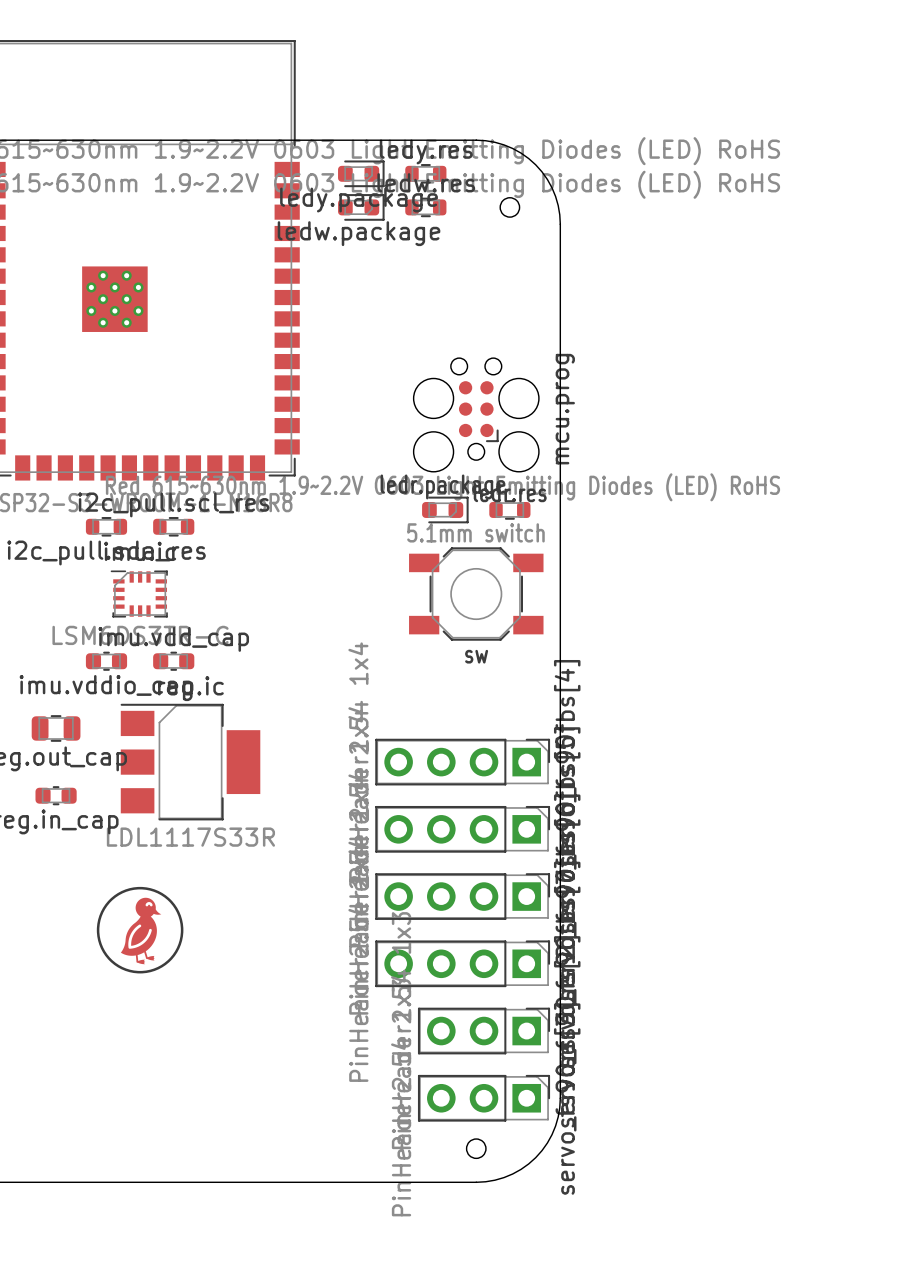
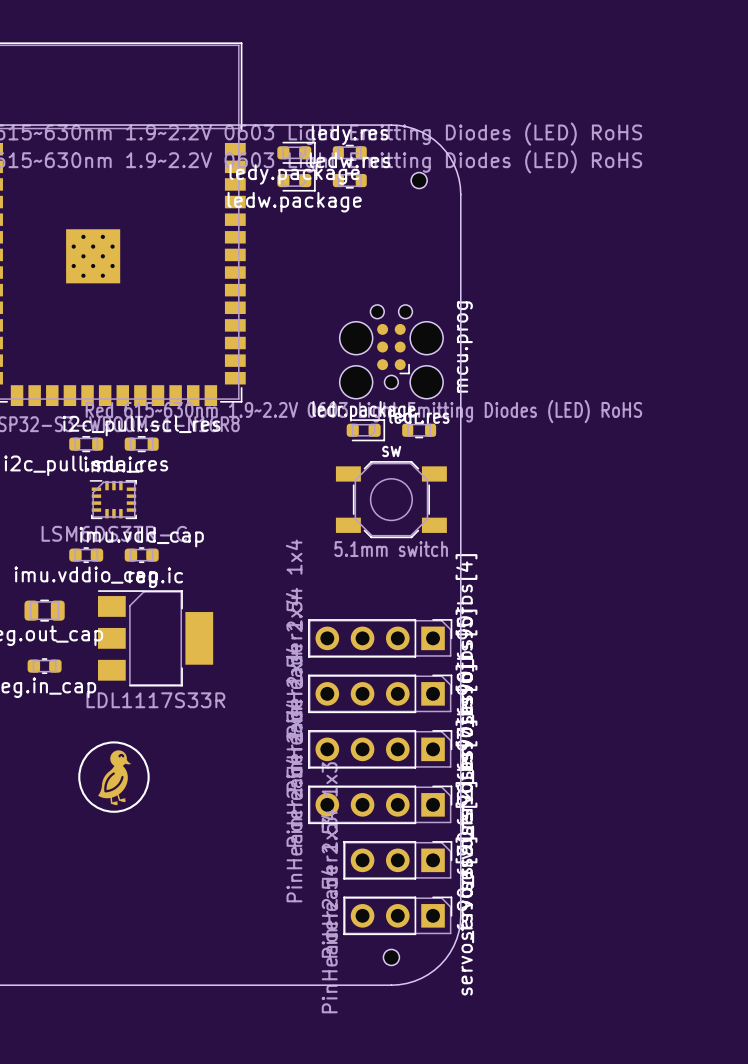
sw value position: 5.1mm switch (475, 532) -> 5.1mm switch (391, 549)
sw name position: sw (476, 656) -> sw (391, 451)

